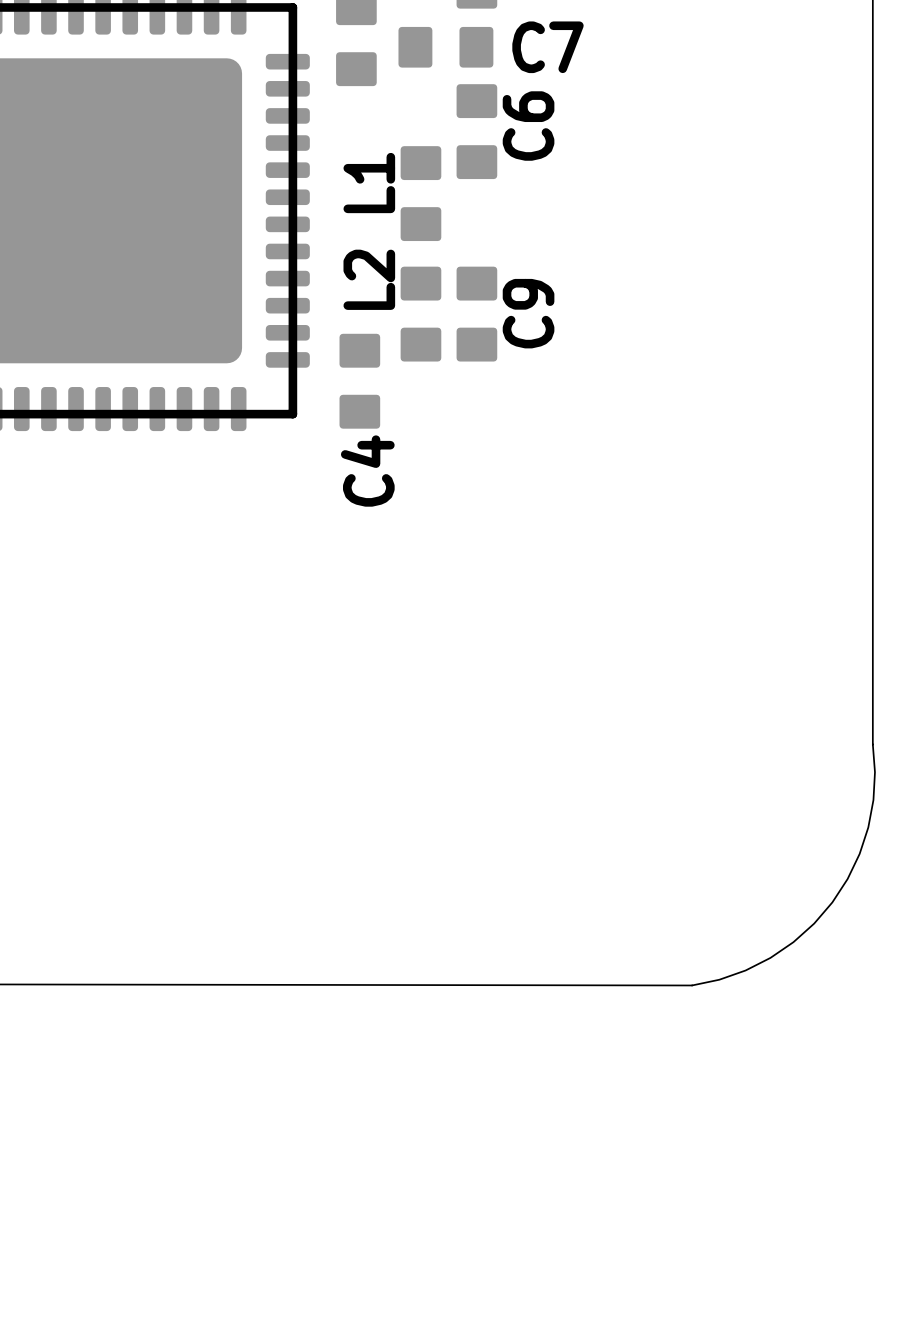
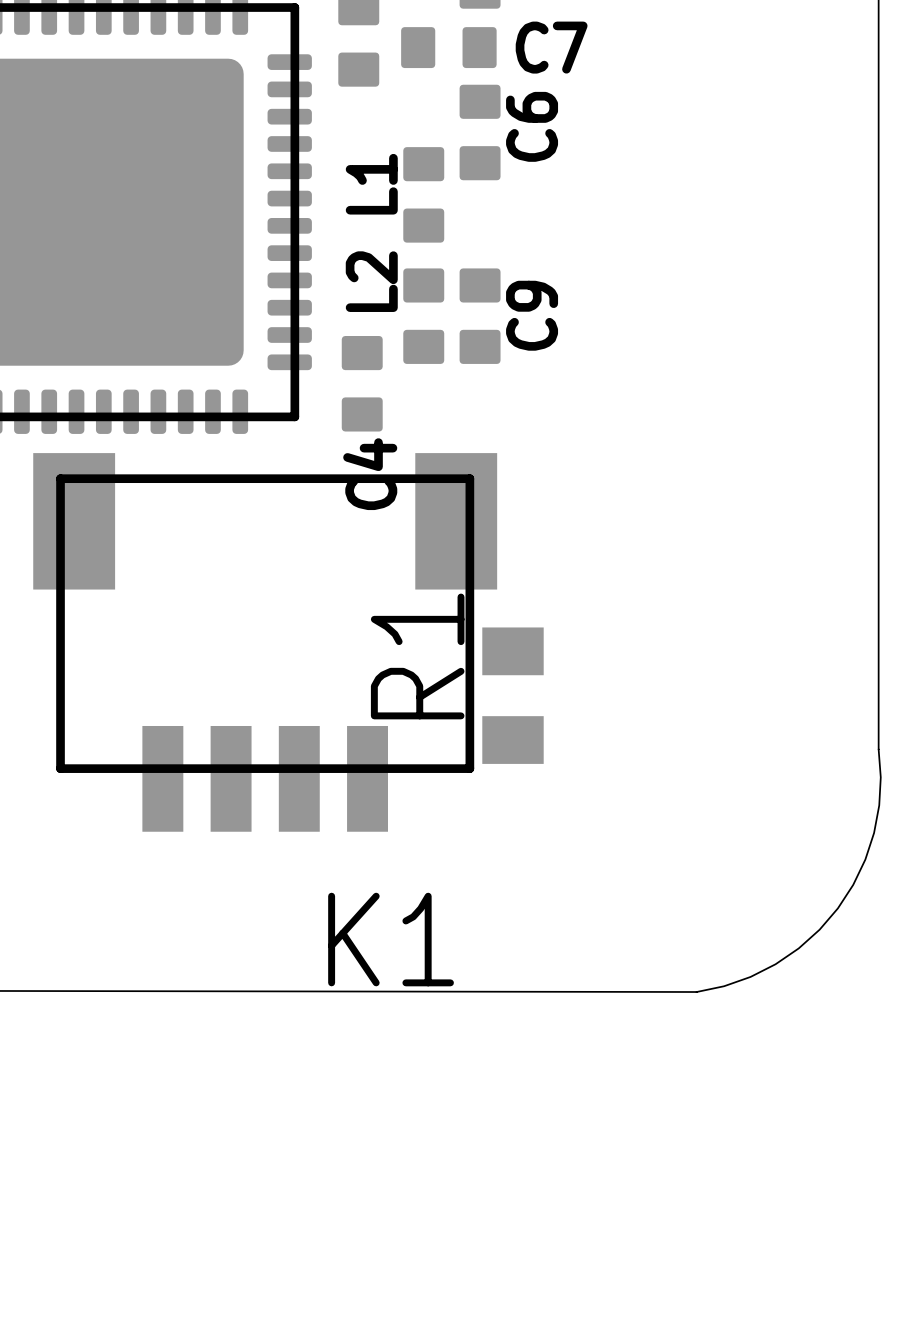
K1: none -> (265, 642)
R1: none -> (512, 695)

